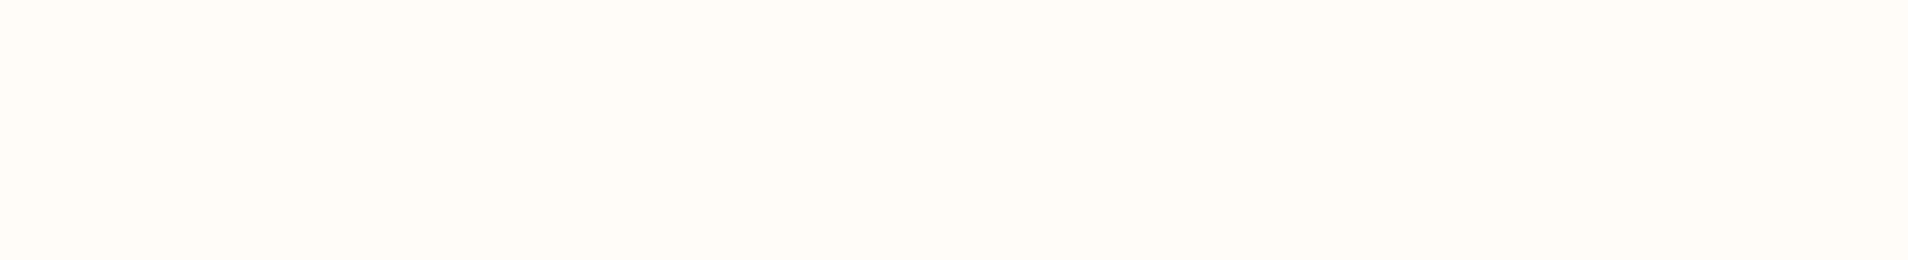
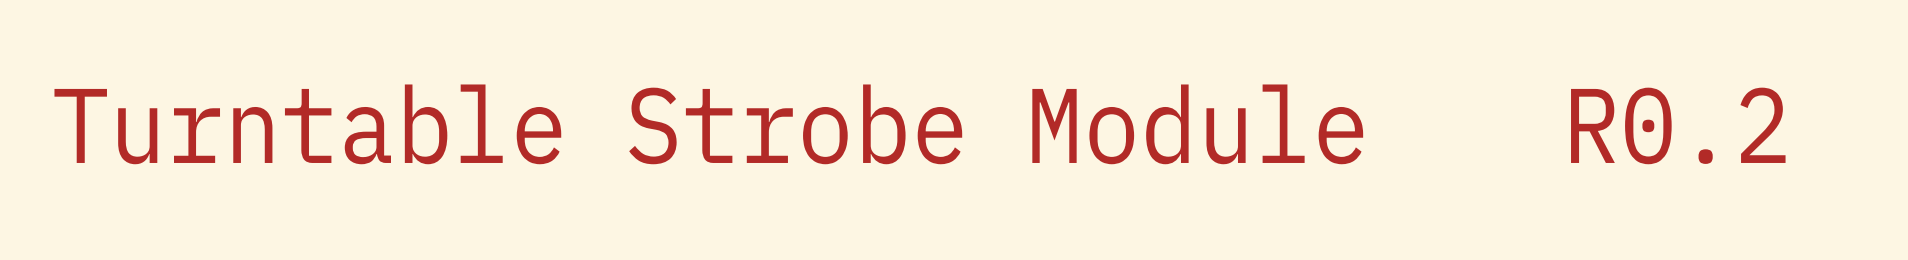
text: none -> Turntable Strobe Module (708, 124)
text: none -> R0.2 (1678, 125)

